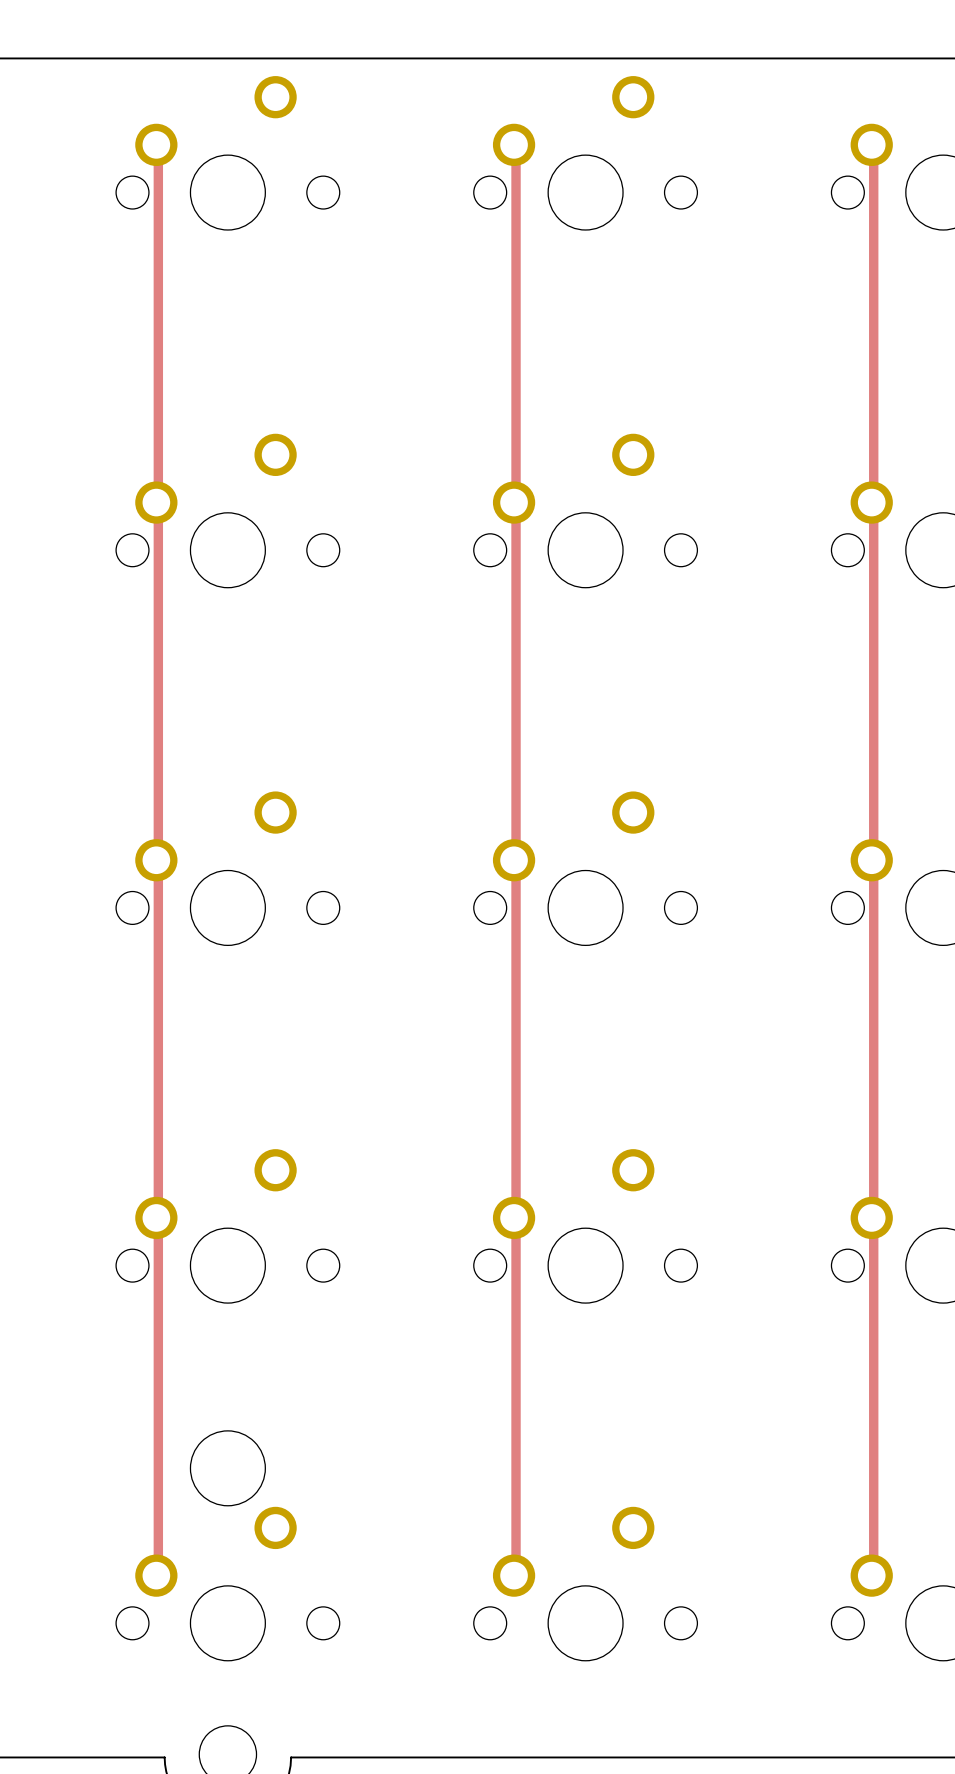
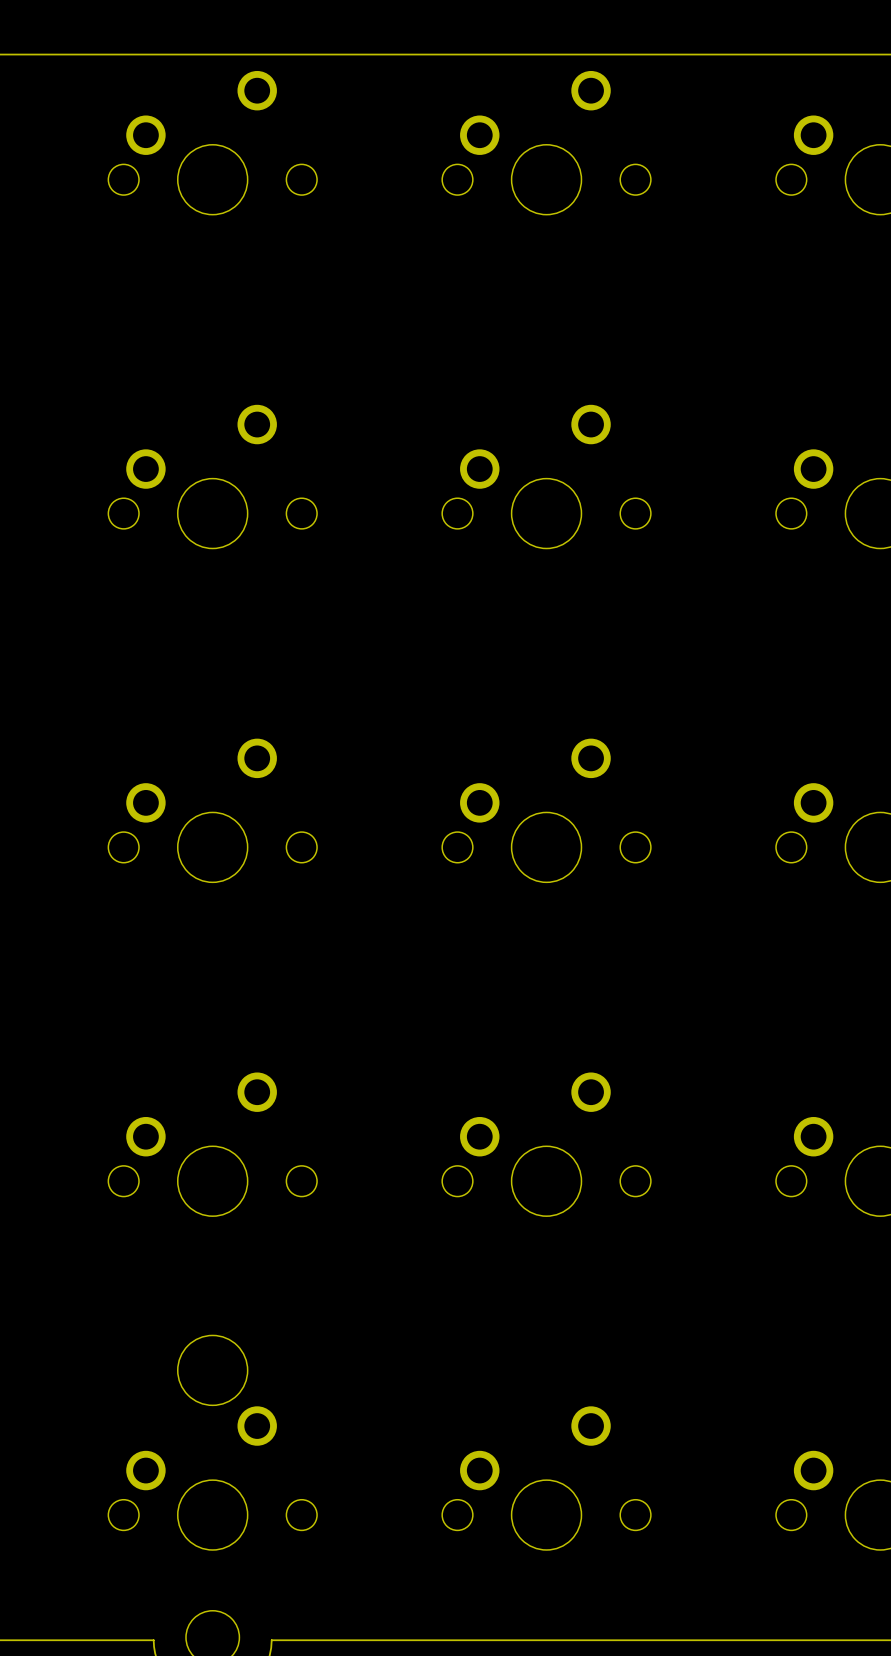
track: (158, 146) (158, 1573) (156, 1575) -> none
track: (516, 146) (516, 1573) (514, 1575) -> none
track: (873, 146) (873, 1573) (871, 1575) -> none

